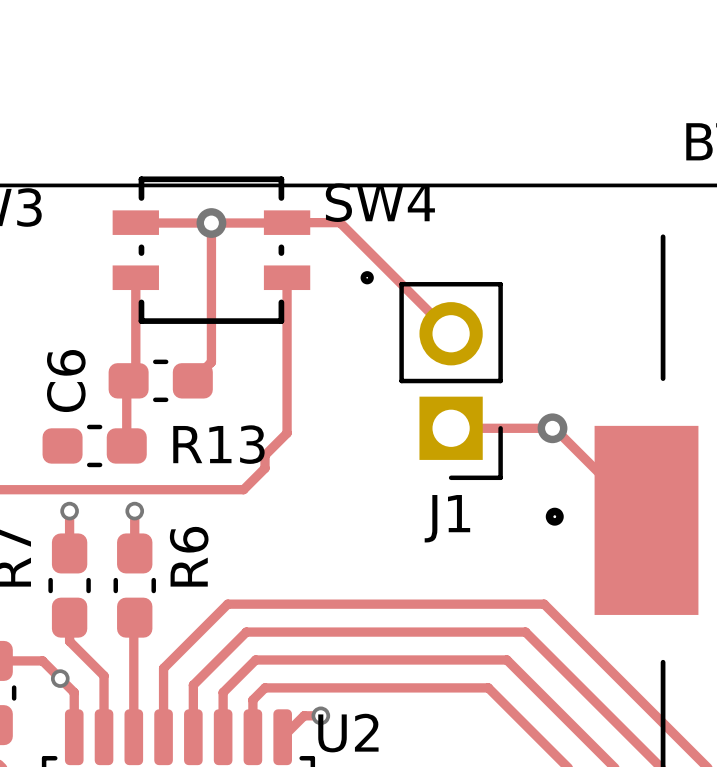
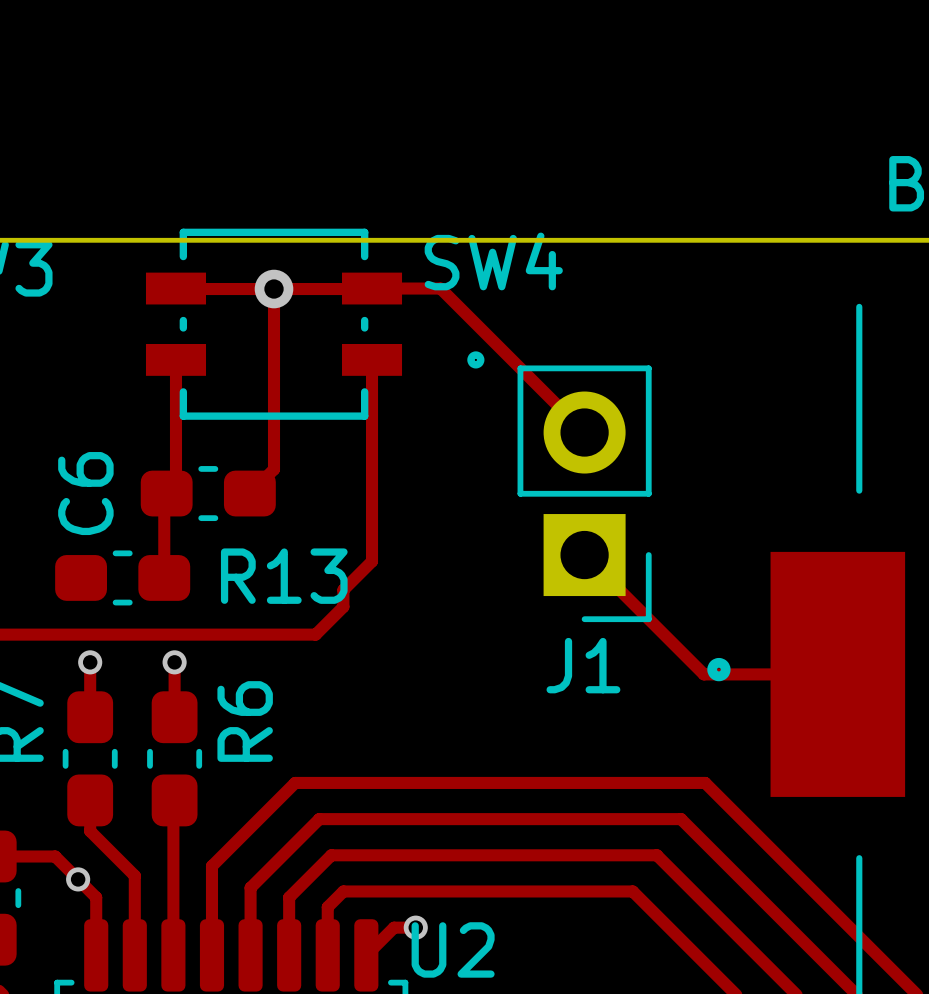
track: (451, 428) (554, 428) (646, 520) -> (584, 555) (703, 674) (837, 674)
via: (552, 428) -> none

